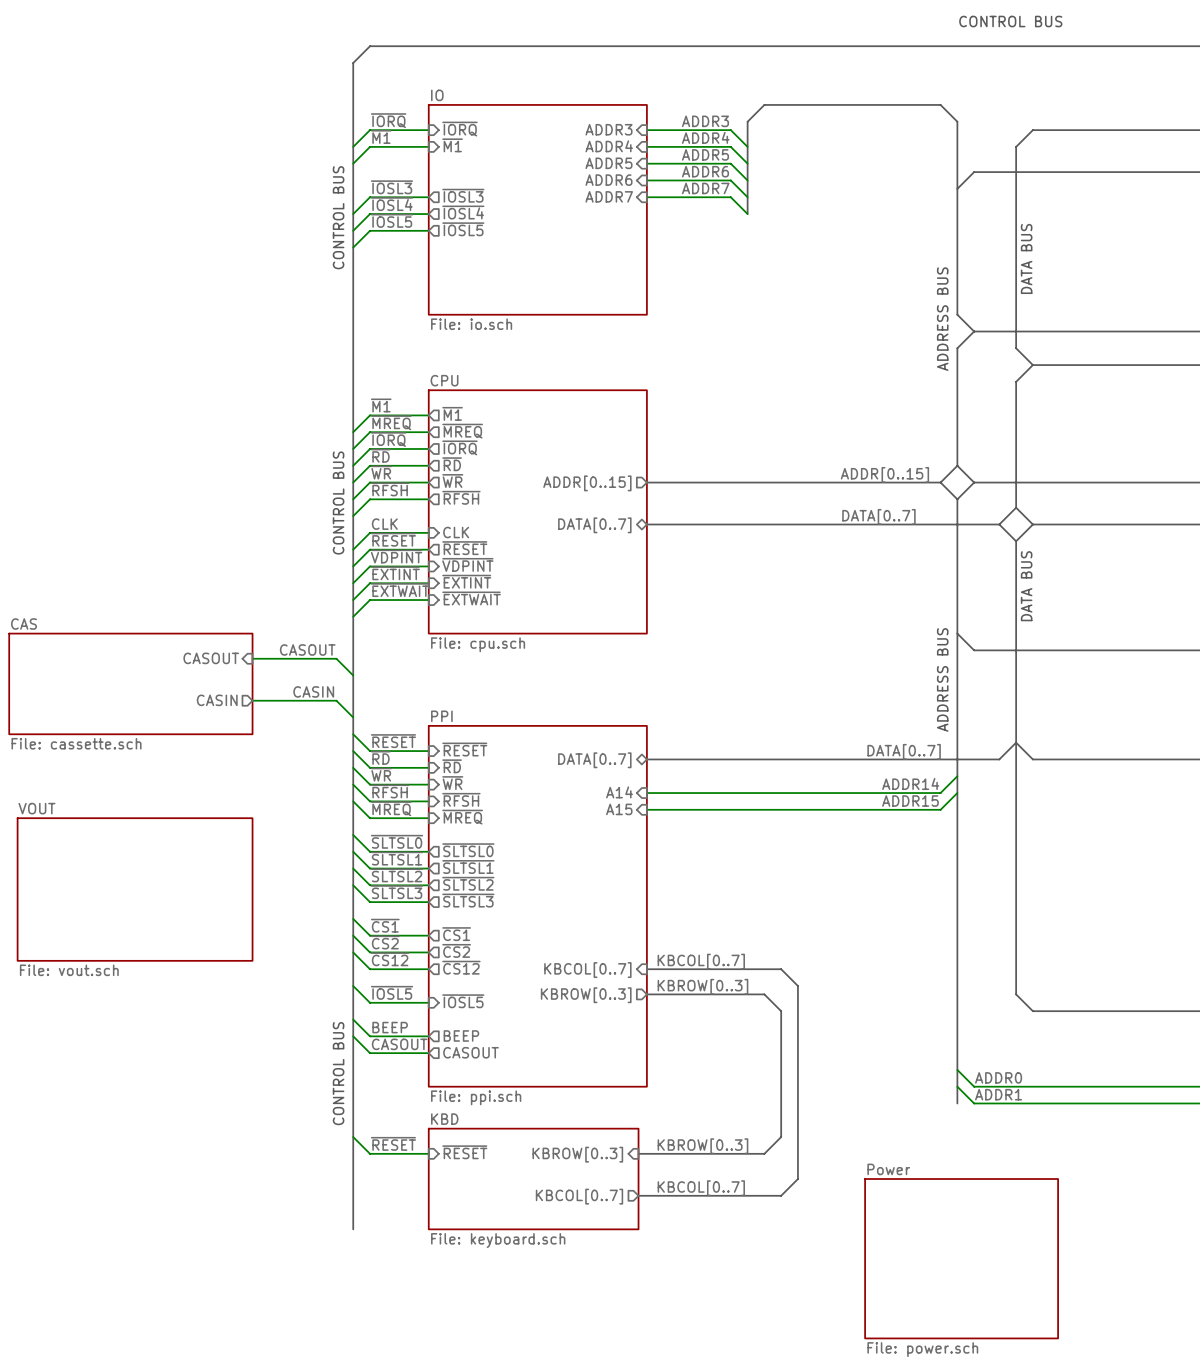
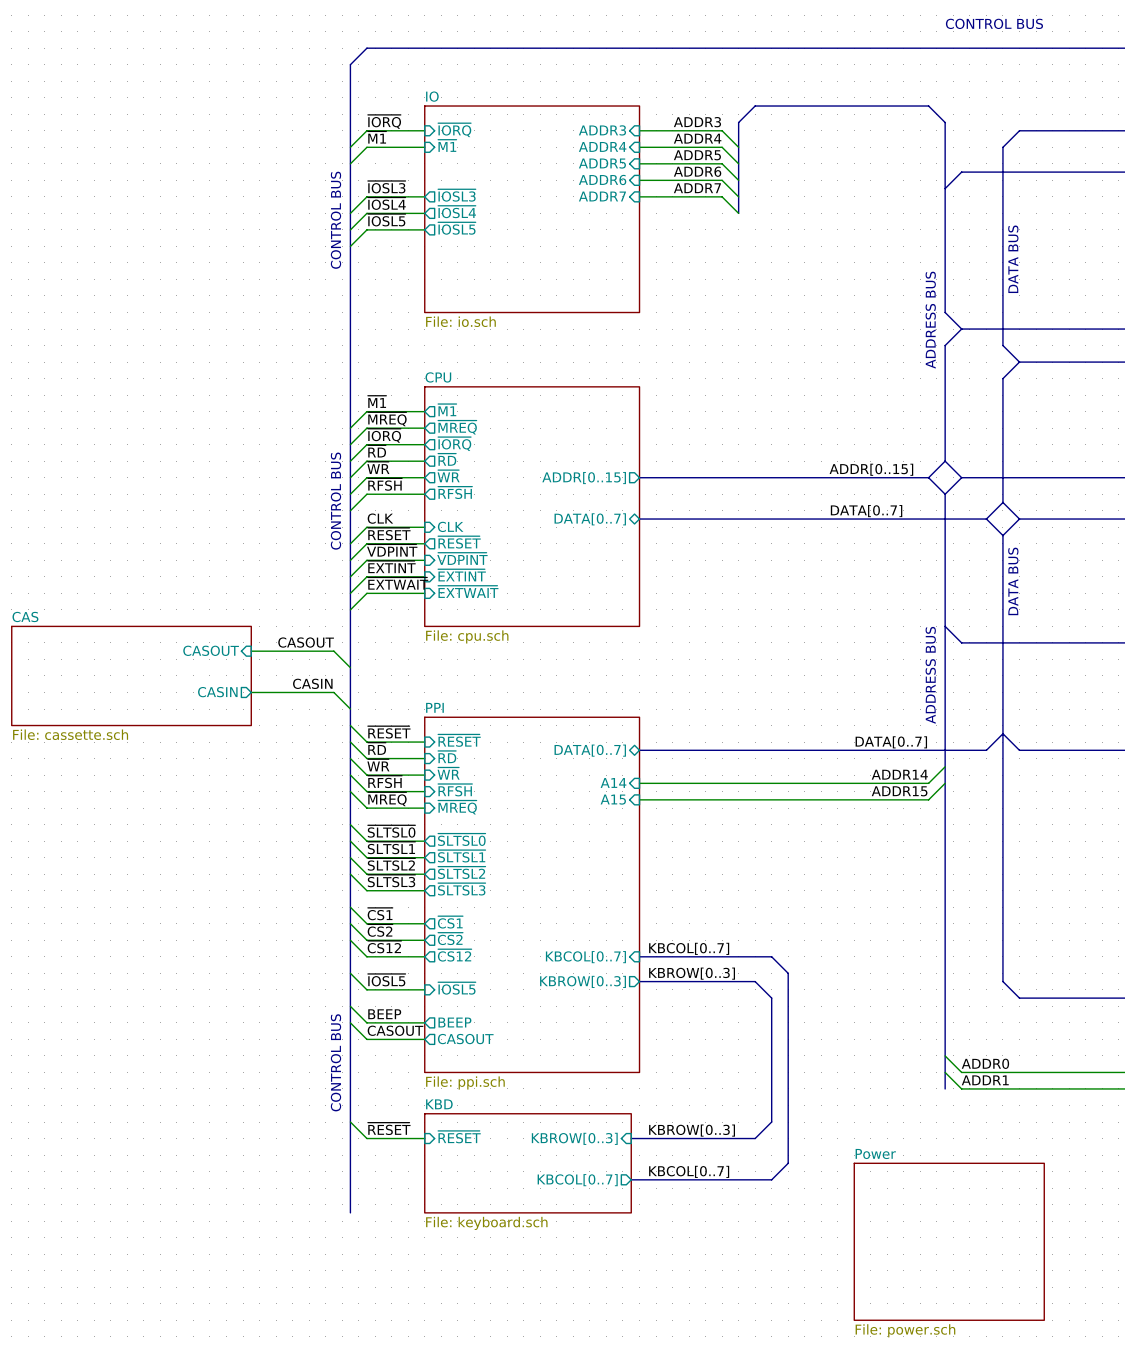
sheet VOUT: File: vout.sch (135, 889) -> none

